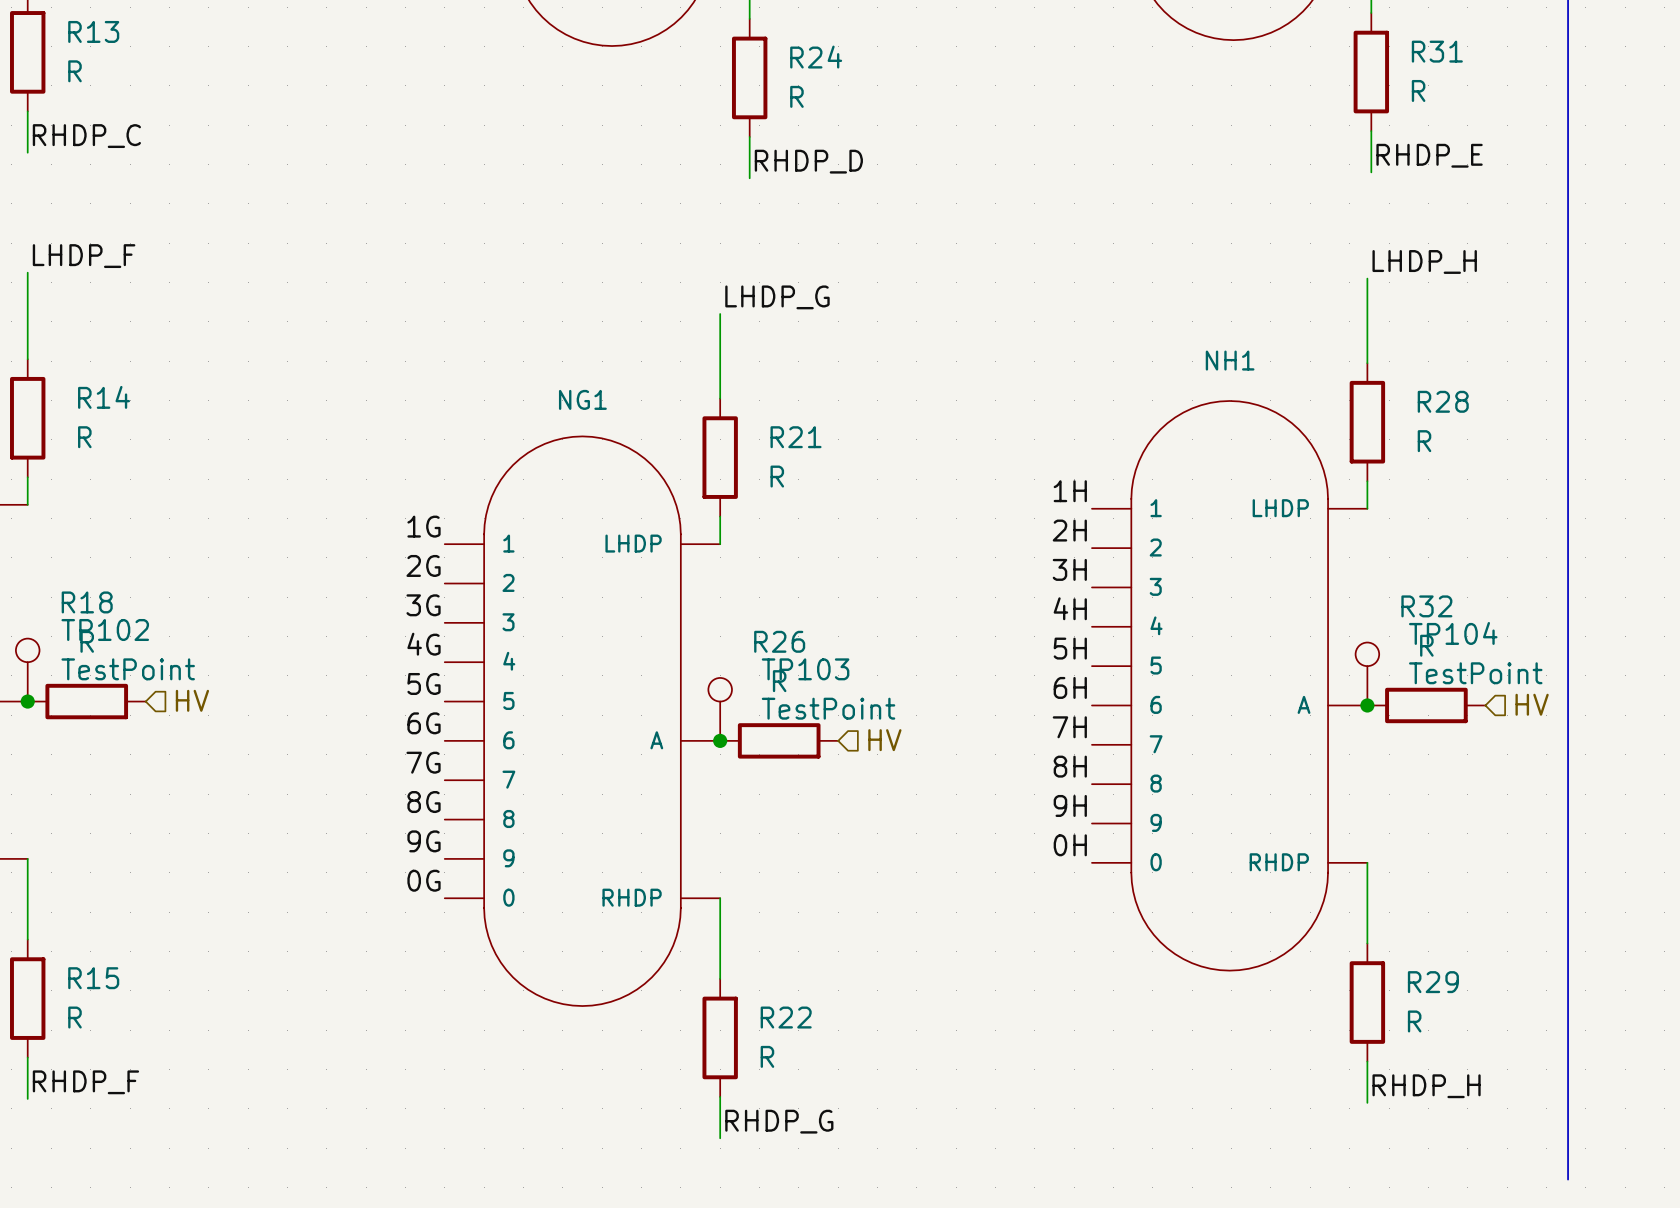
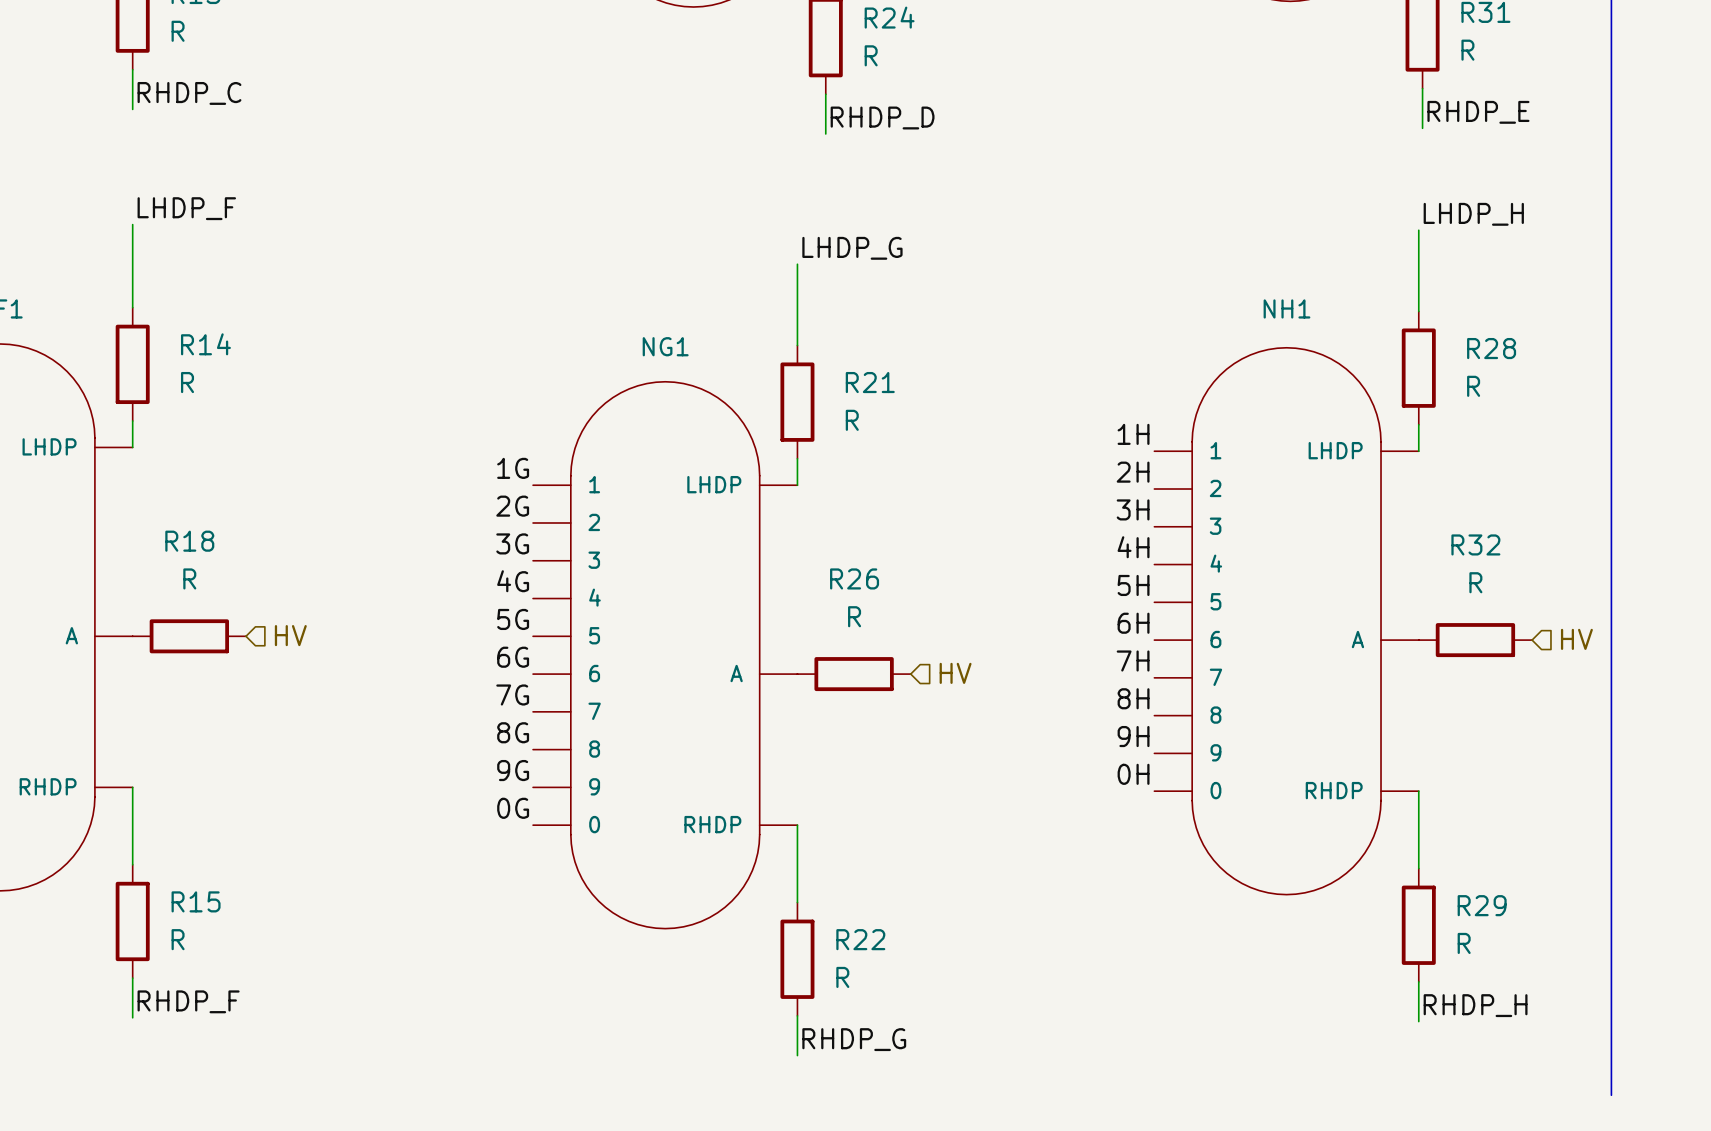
TP102: TestPoint (27, 670) -> none
TP104: TestPoint (1367, 674) -> none
junction: (27, 701) -> none
junction: (1367, 705) -> none
TP103: TestPoint (720, 709) -> none
junction: (720, 740) -> none

